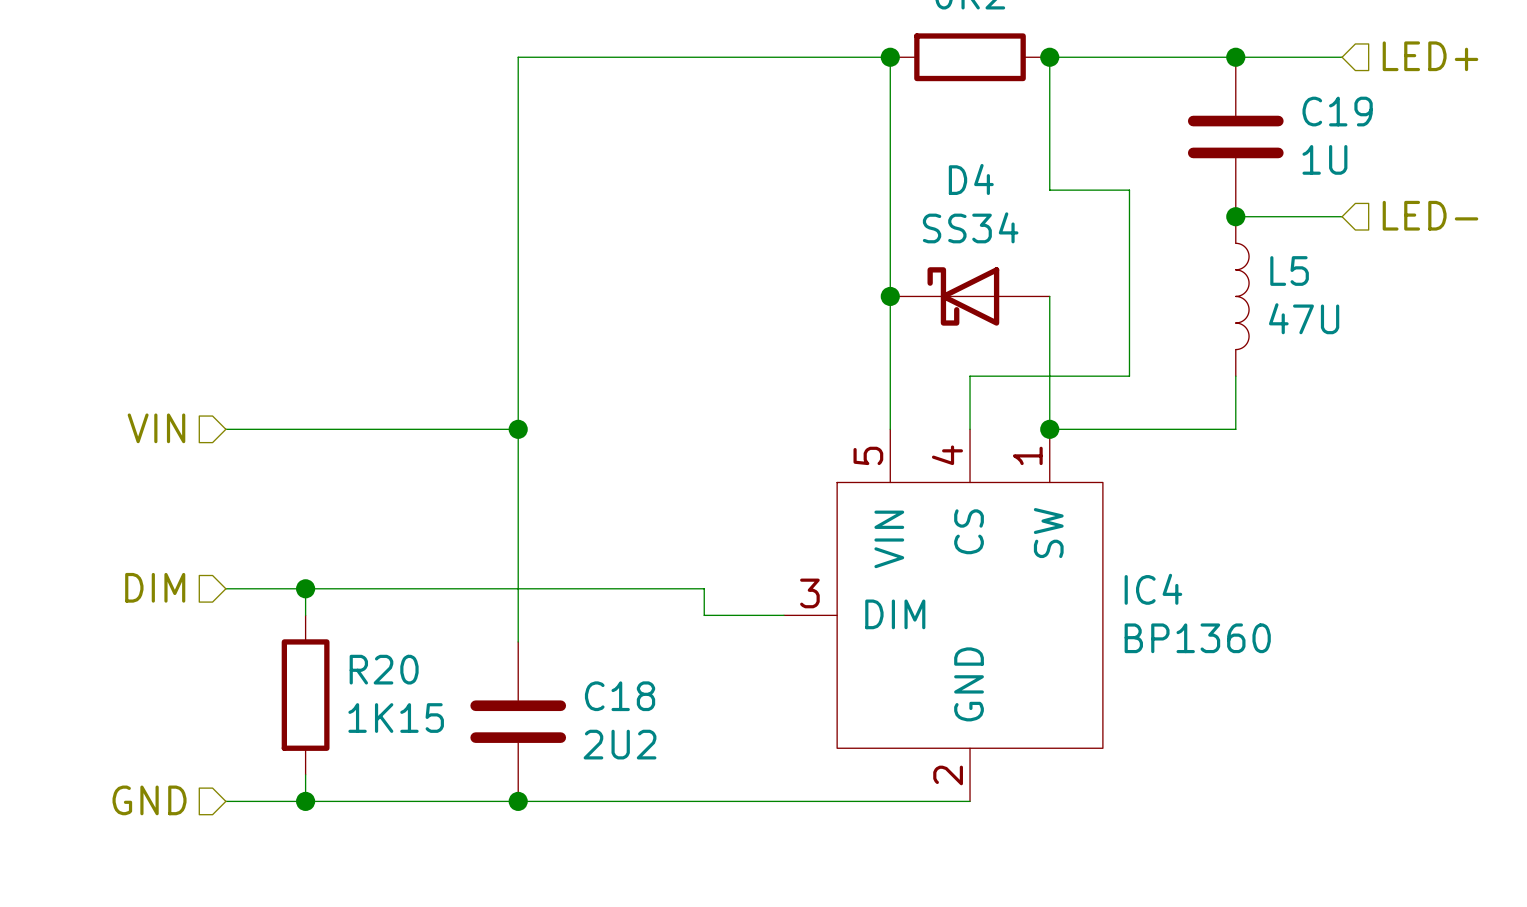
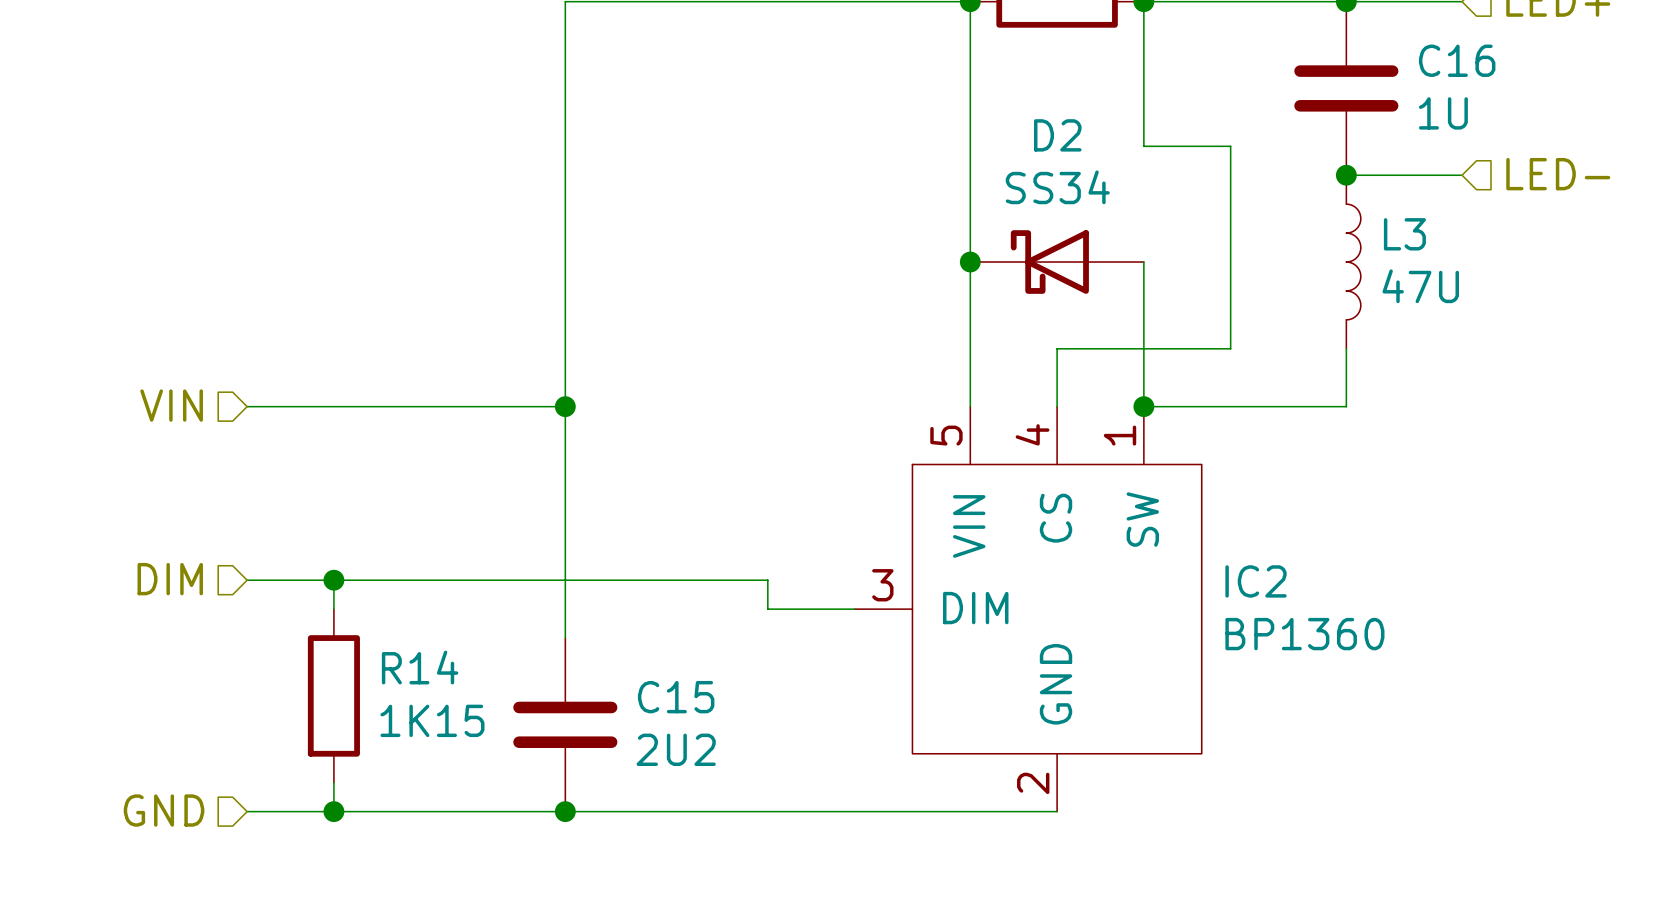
C19 name: C19 (1337, 111) -> C16 (1457, 60)
D4 name: D4 (971, 179) -> D2 (1057, 135)
L5 name: L5 (1289, 271) -> L3 (1404, 234)
IC4 name: IC4 (1153, 589) -> IC2 (1256, 581)
R20 name: R20 (384, 669) -> R14 (420, 667)
C18 name: C18 (620, 696) -> C15 (676, 697)

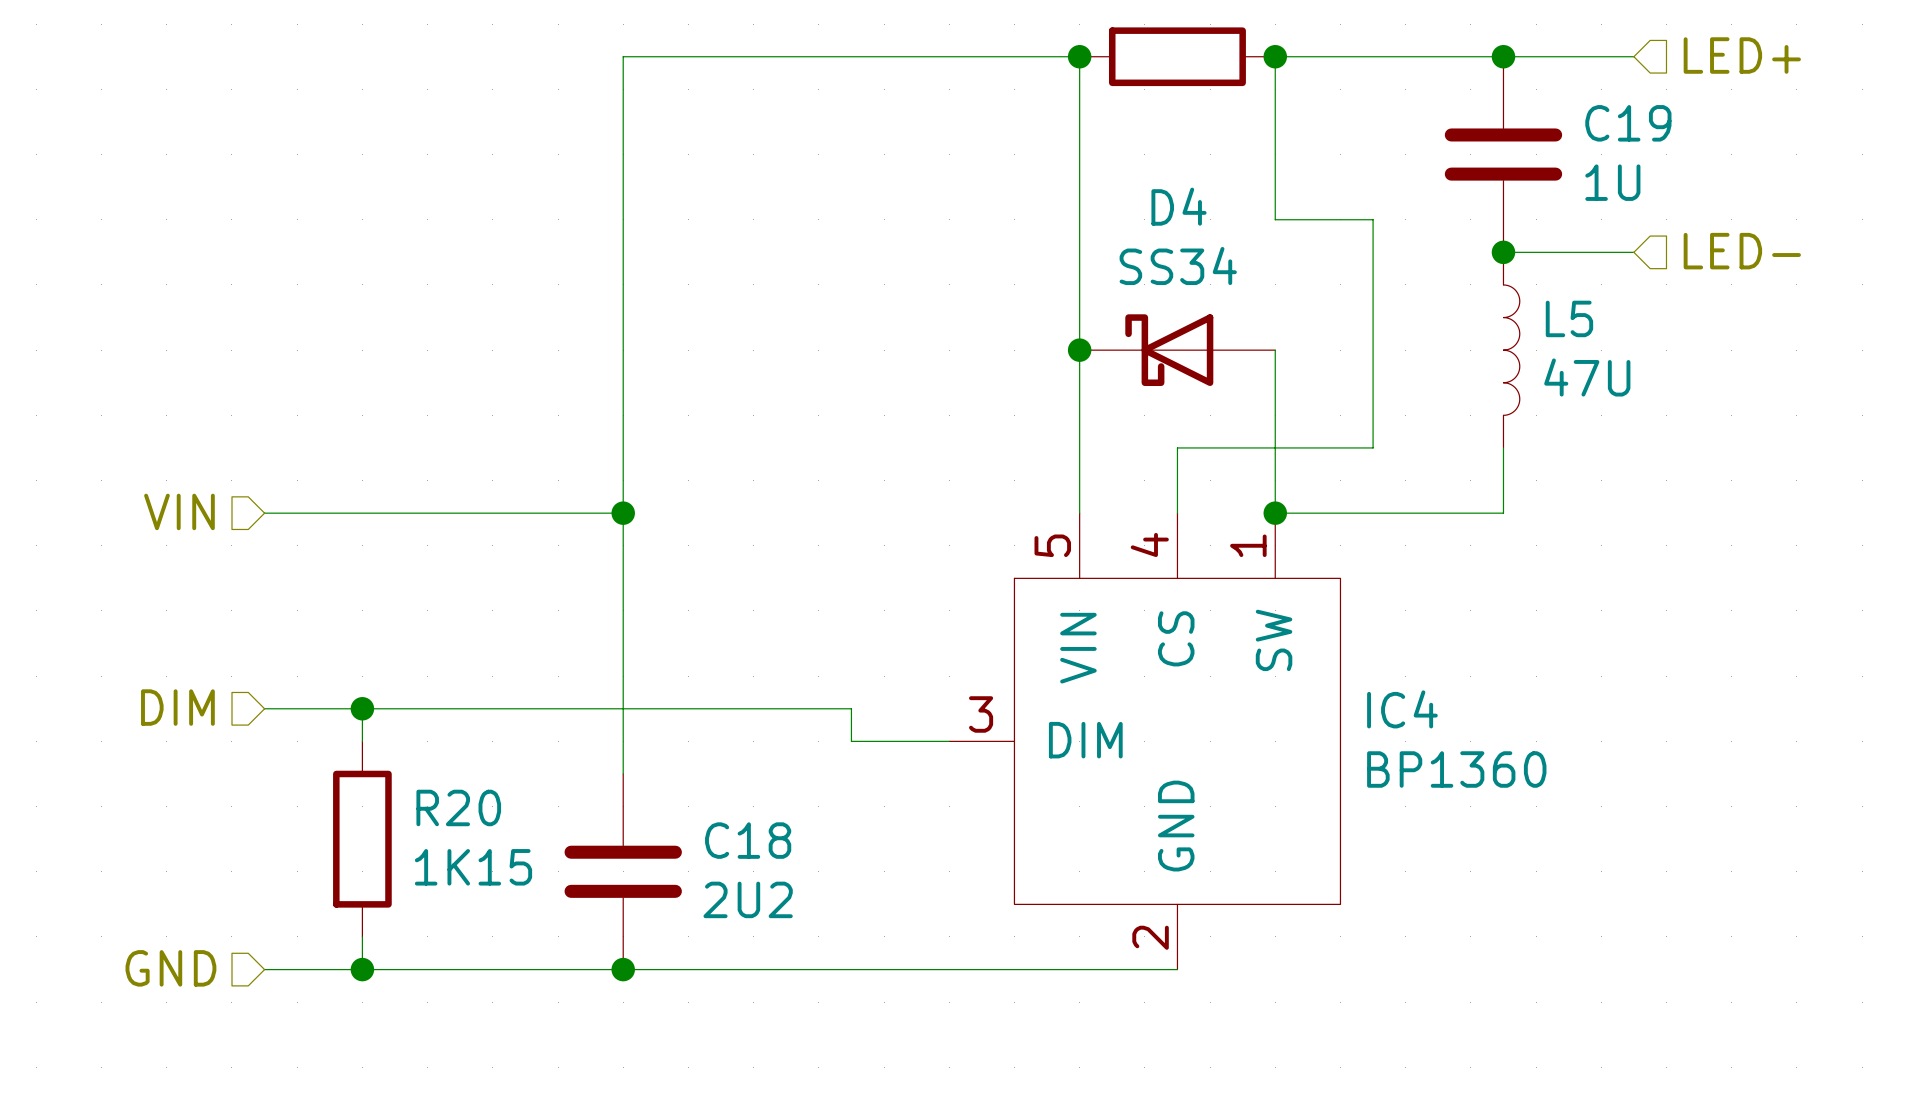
C16 name: C16 (1457, 60) -> C19 (1628, 123)
D2 name: D2 (1057, 135) -> D4 (1179, 206)
L3 name: L3 (1404, 234) -> L5 (1569, 318)
IC2 name: IC2 (1256, 581) -> IC4 (1402, 709)
R14 name: R14 (420, 667) -> R20 (458, 807)
C15 name: C15 (676, 697) -> C18 (748, 840)

